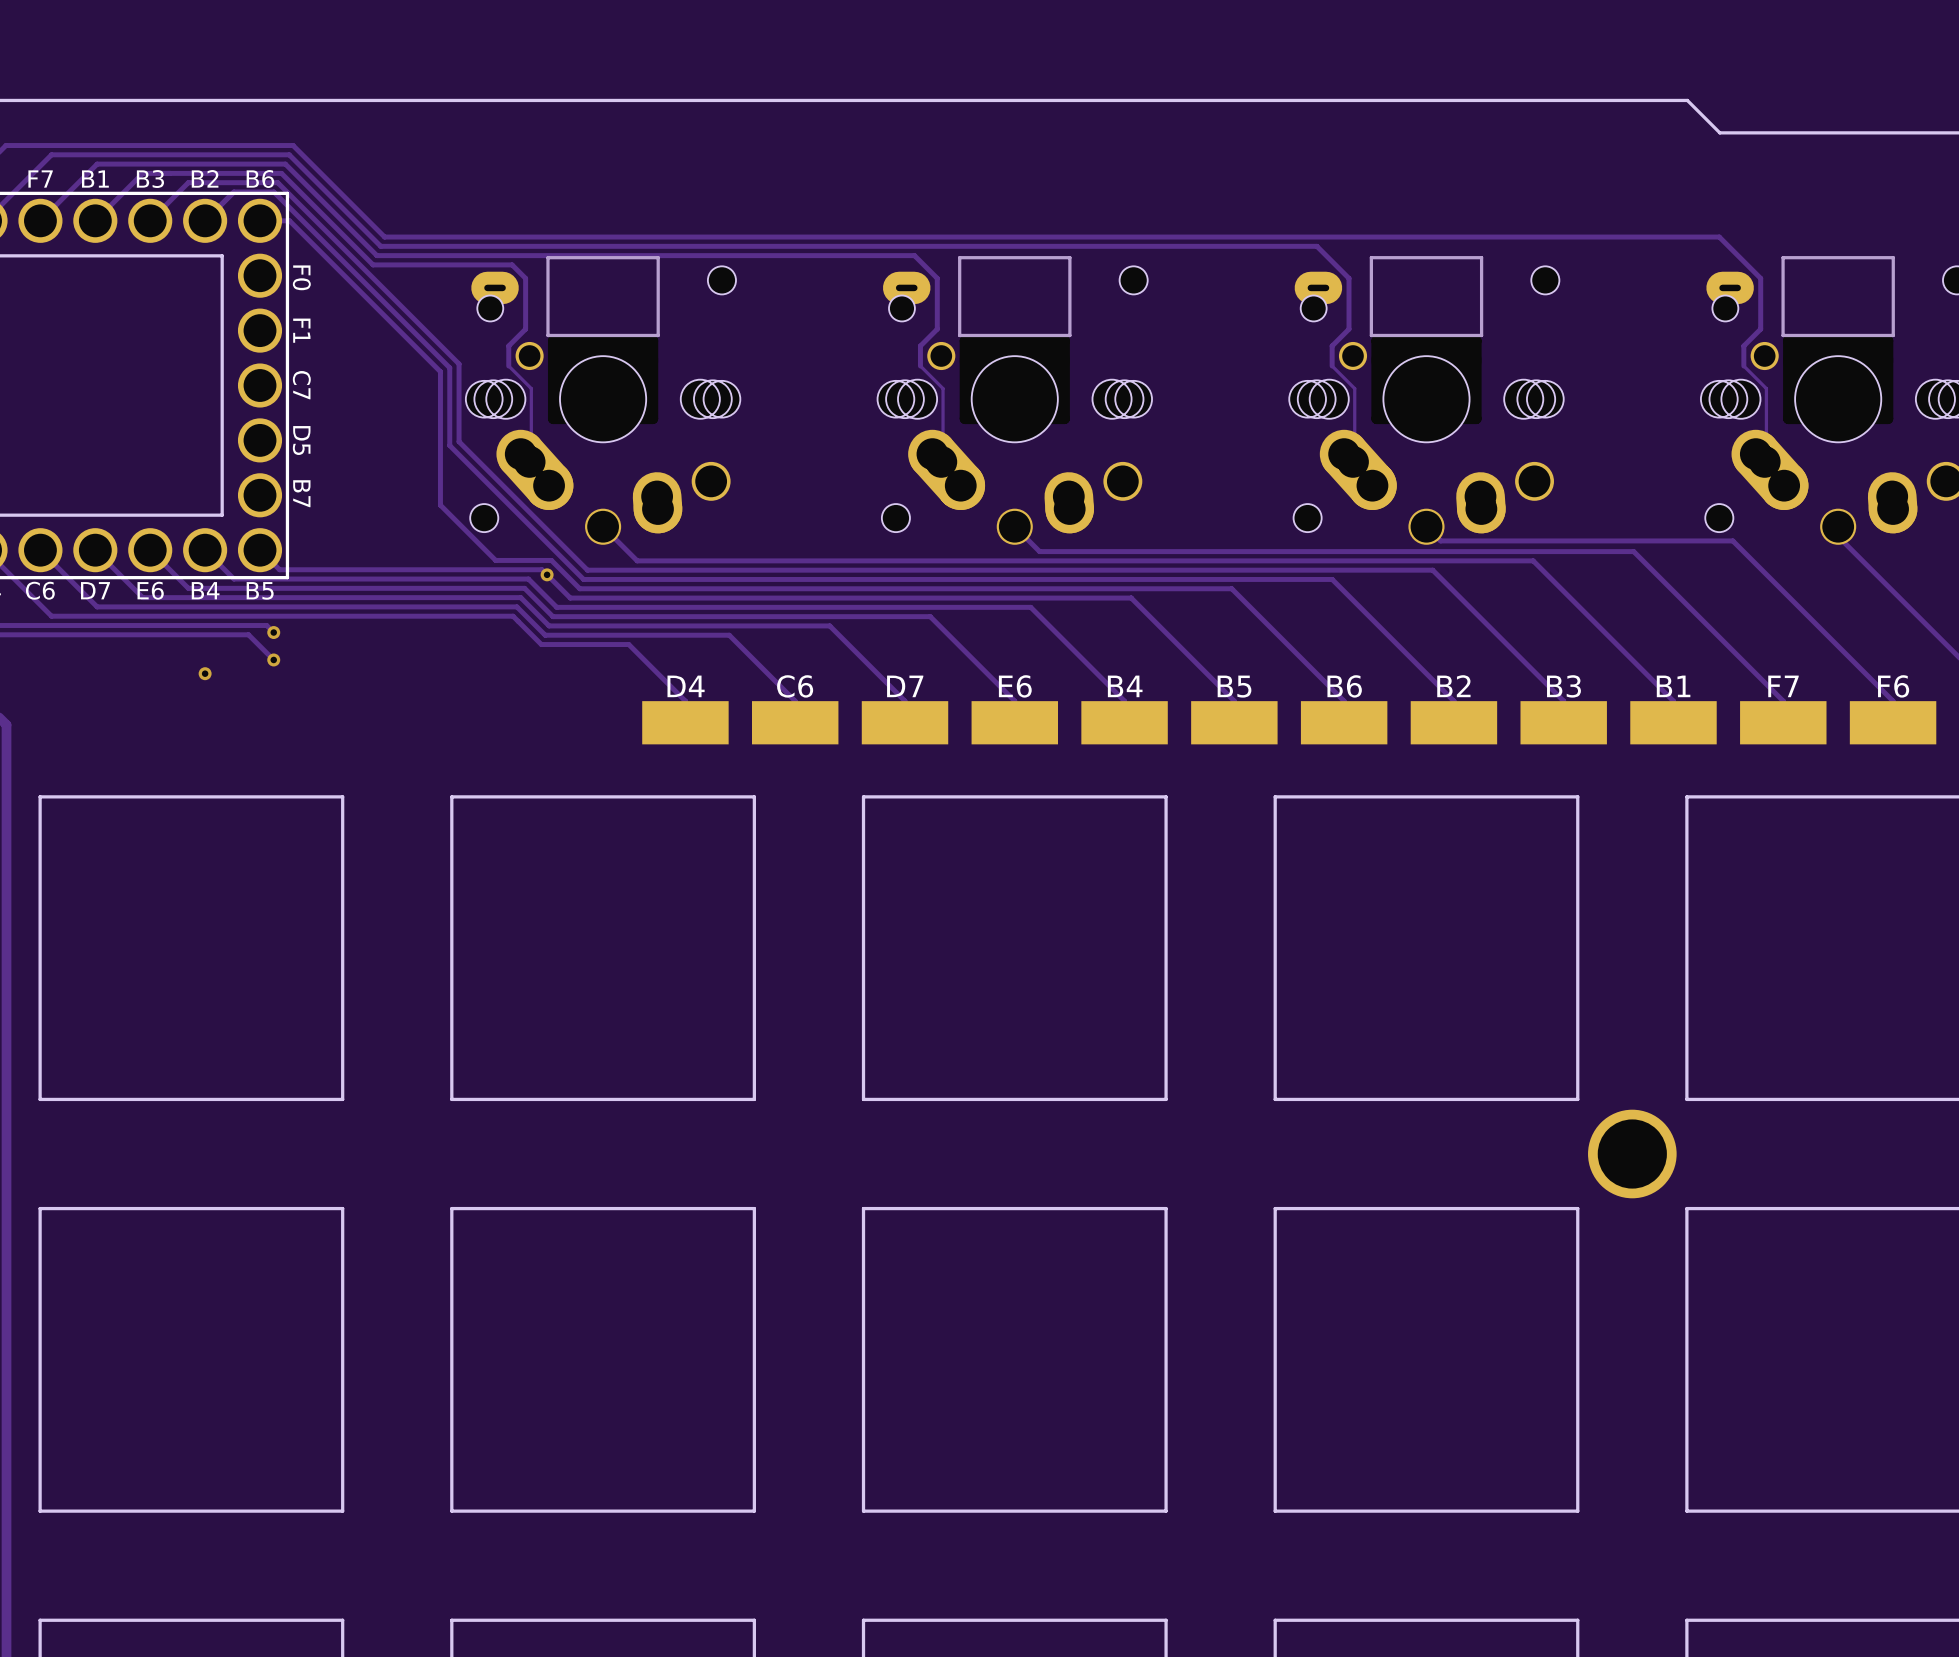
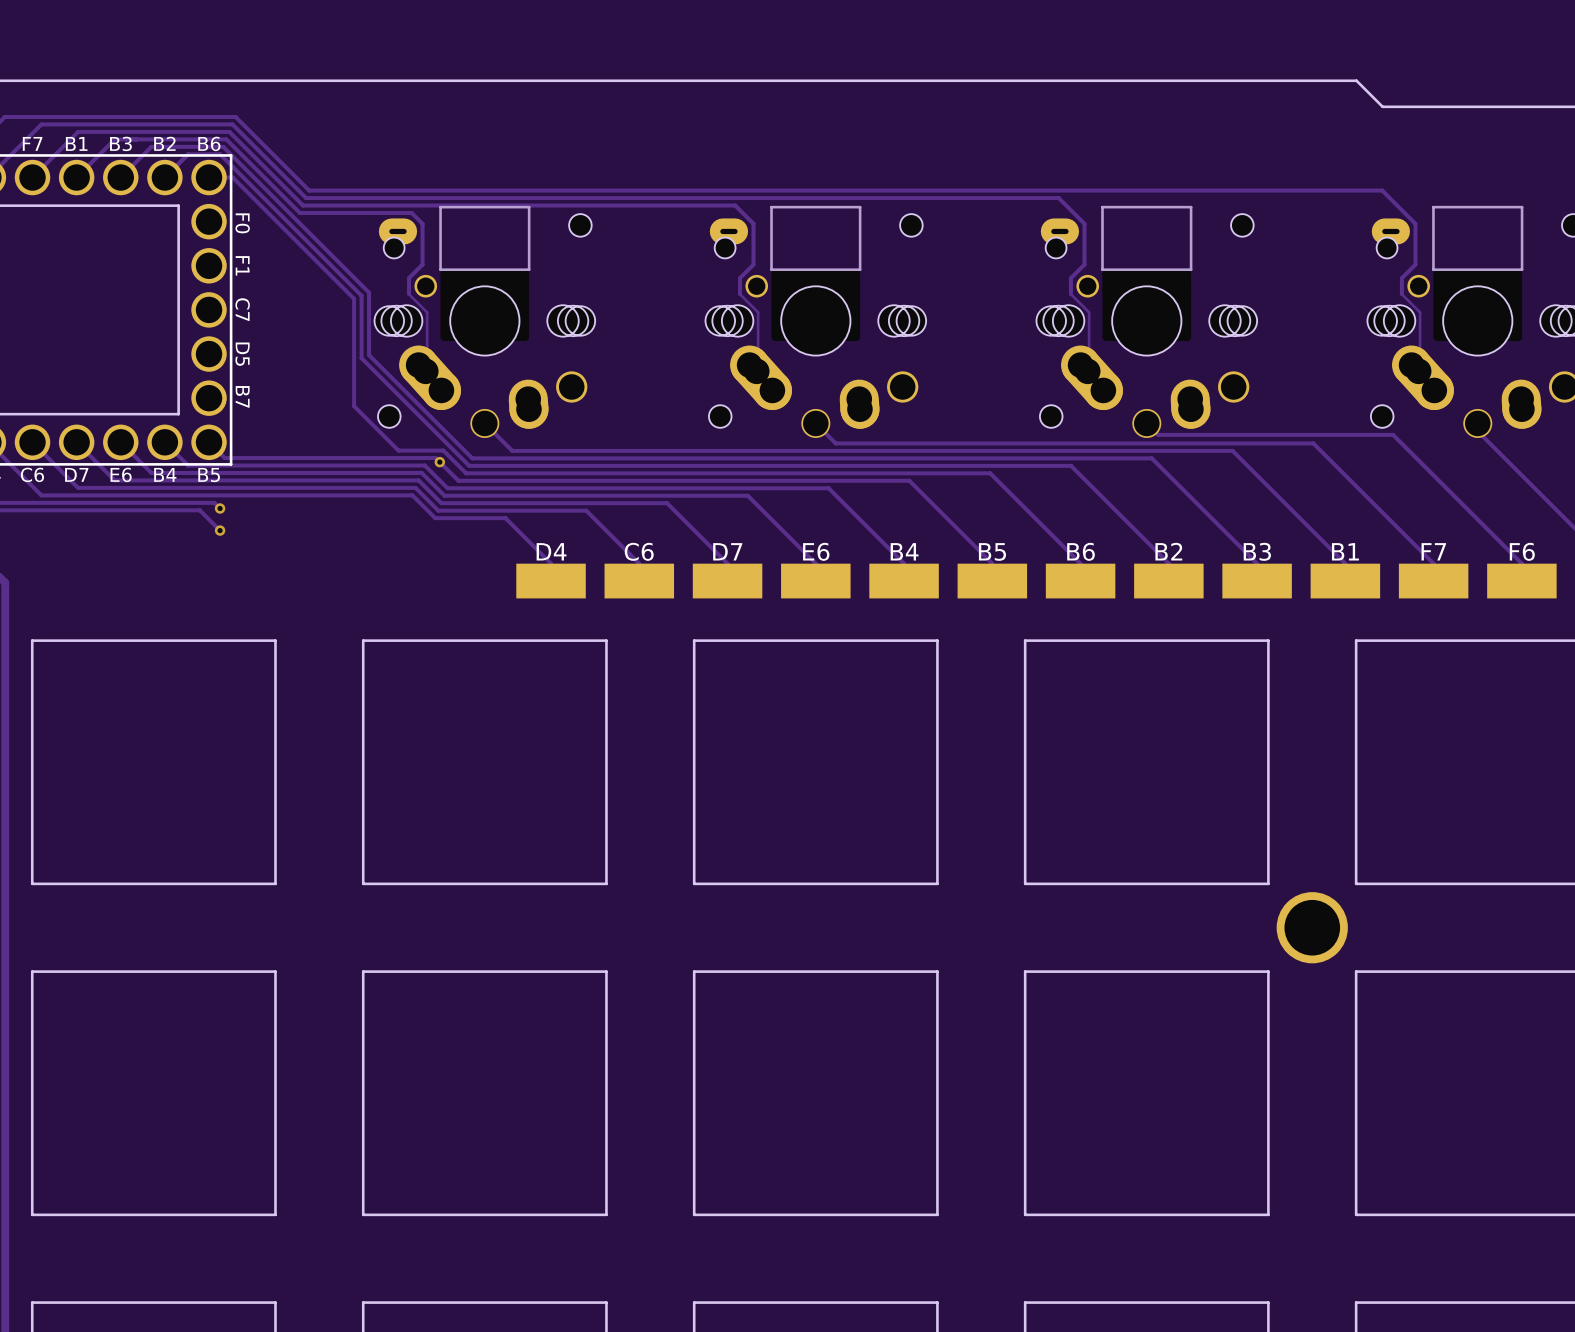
via: (205, 673) -> none

